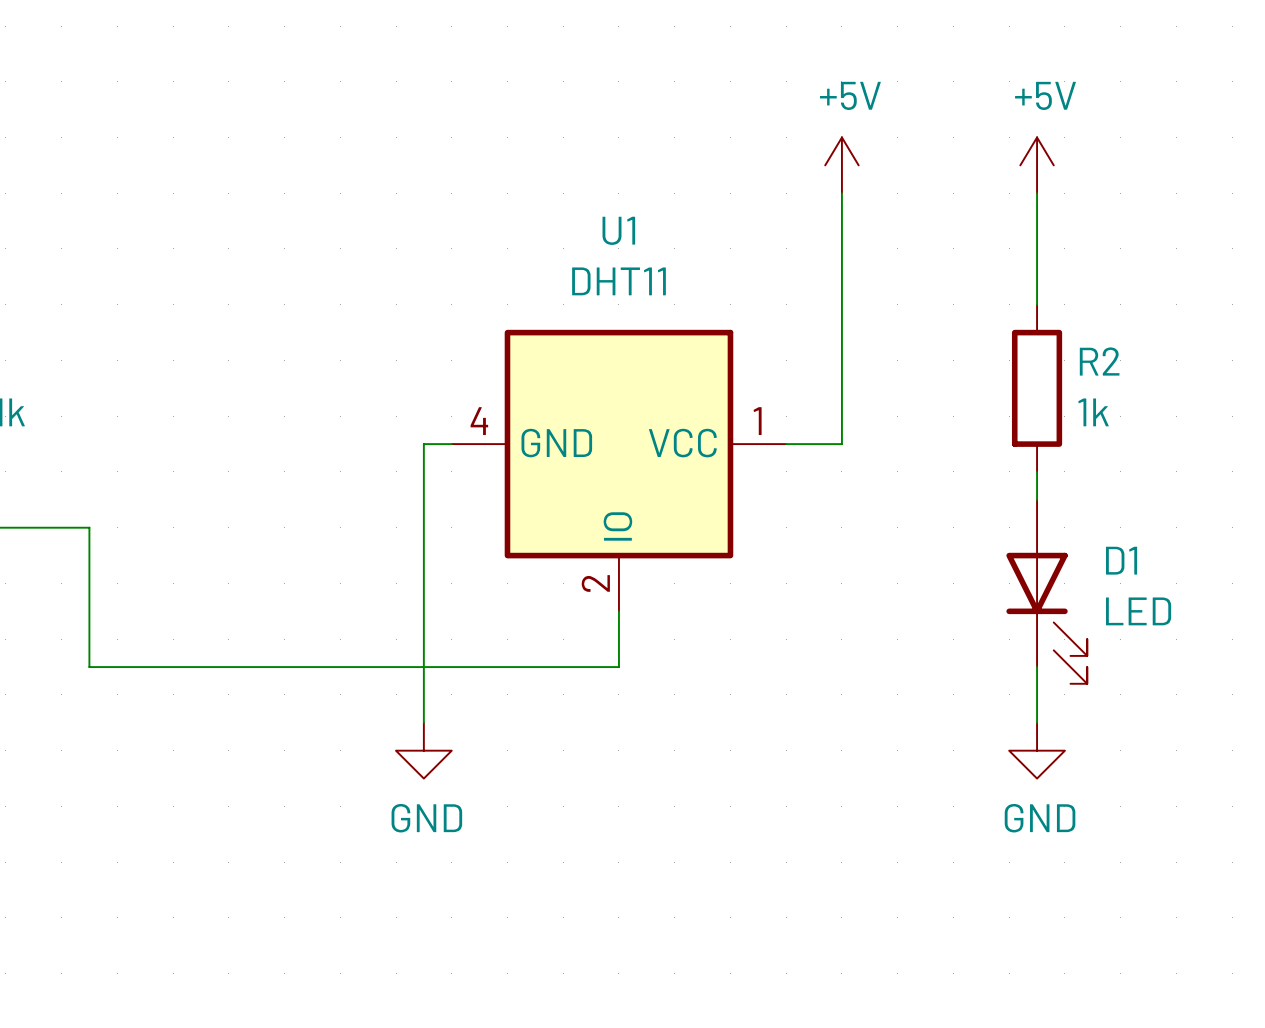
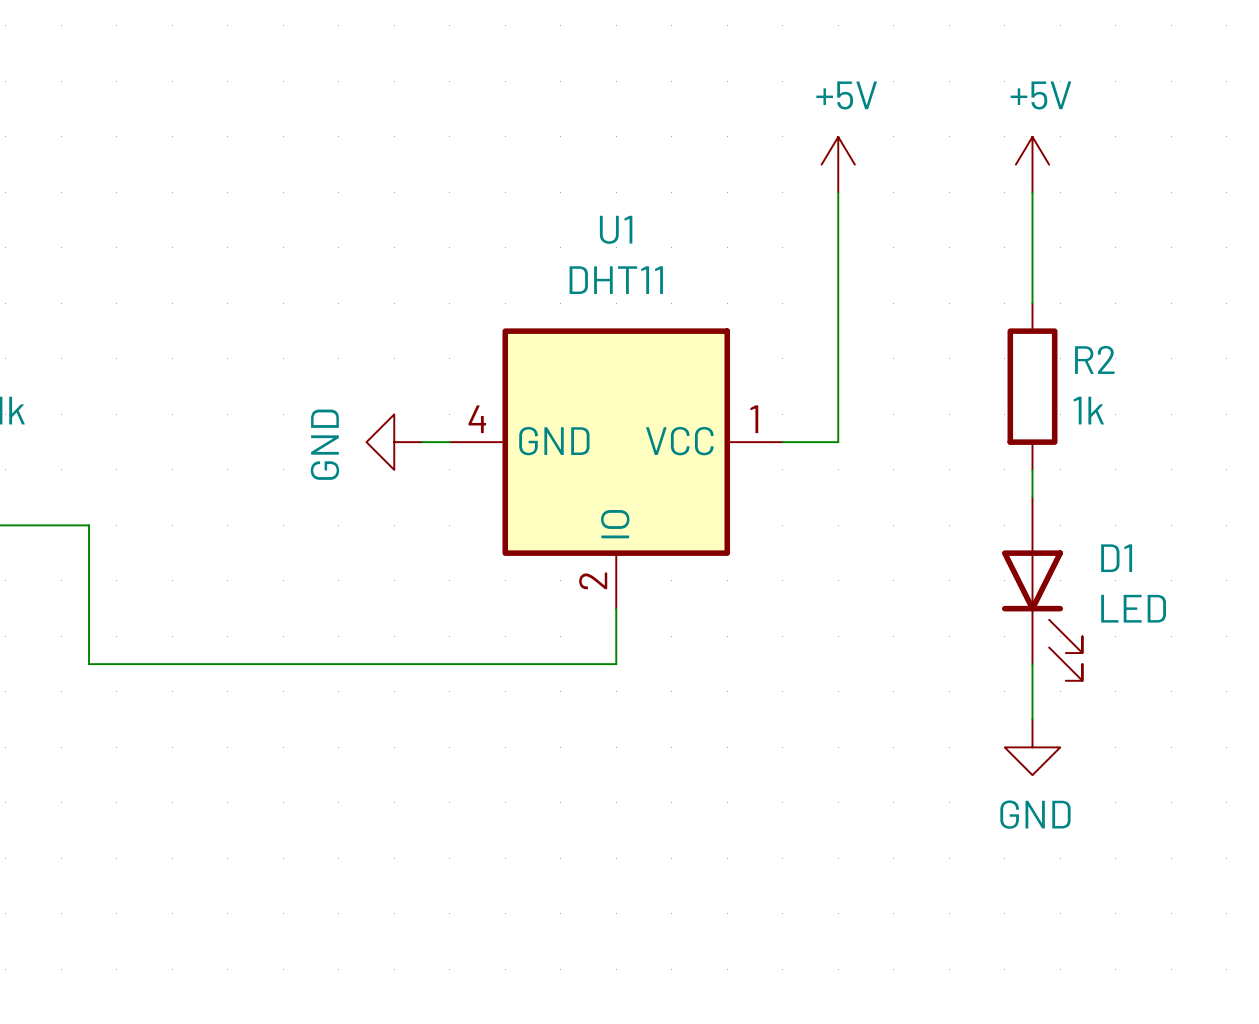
wire: (423, 444) (423, 722) -> none
power symbol rotation: 0° (423, 750) -> 90° clockwise (394, 442)
power symbol position: GND (423, 750) -> GND (394, 442)

